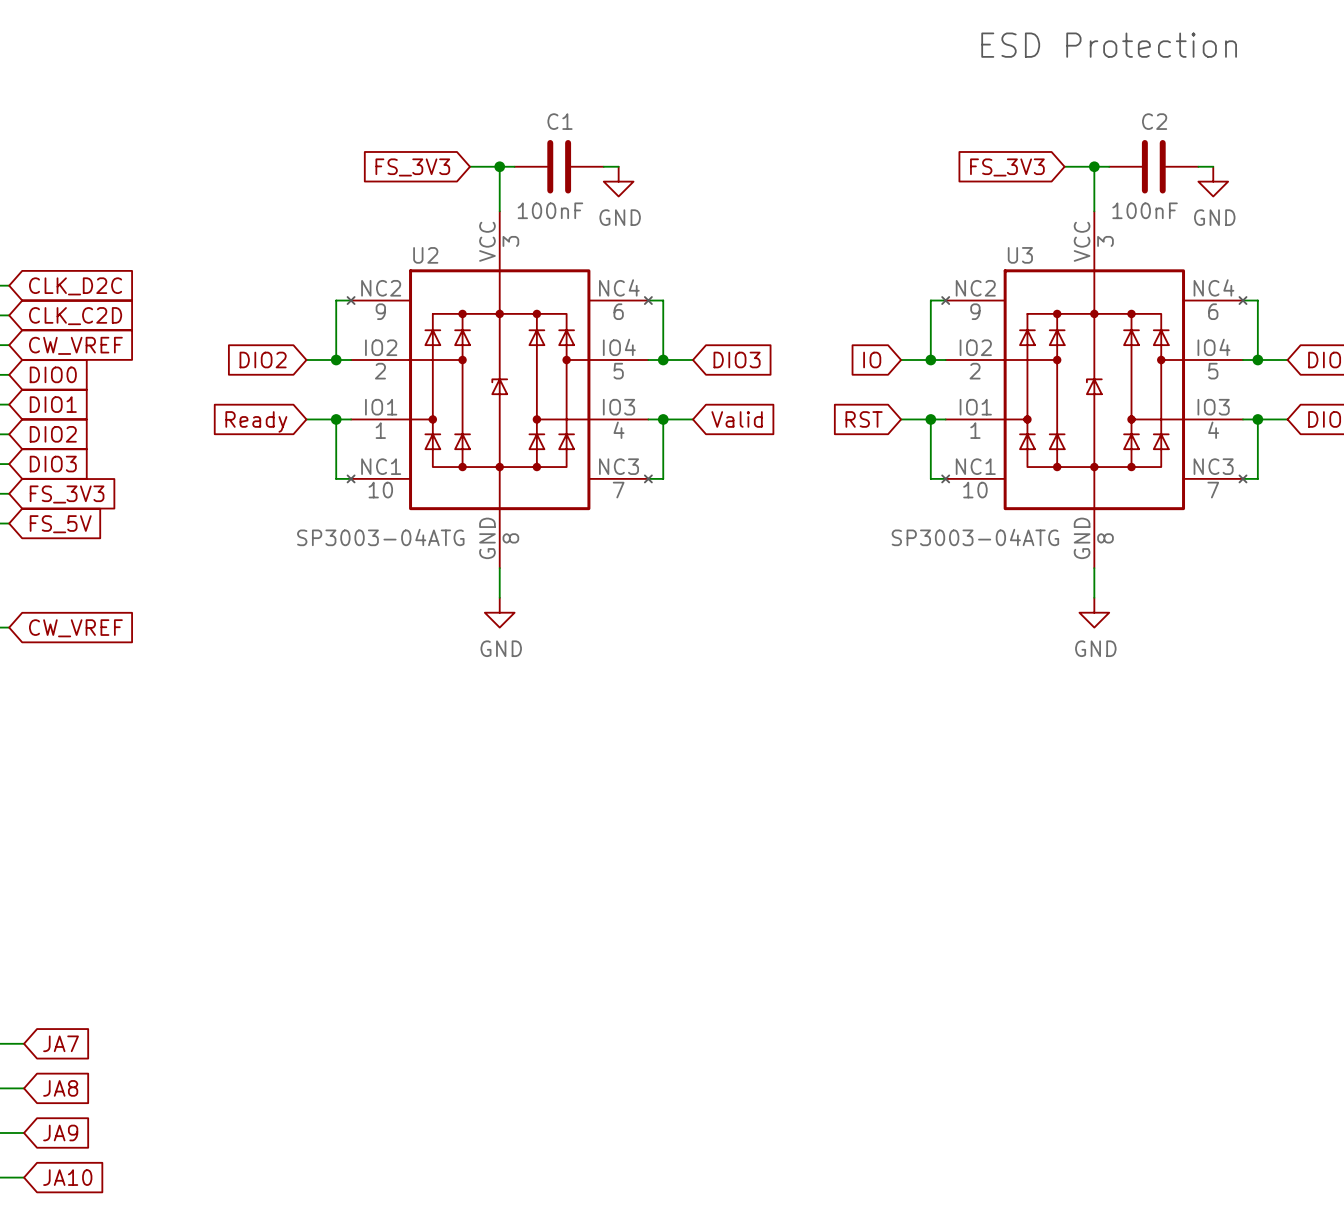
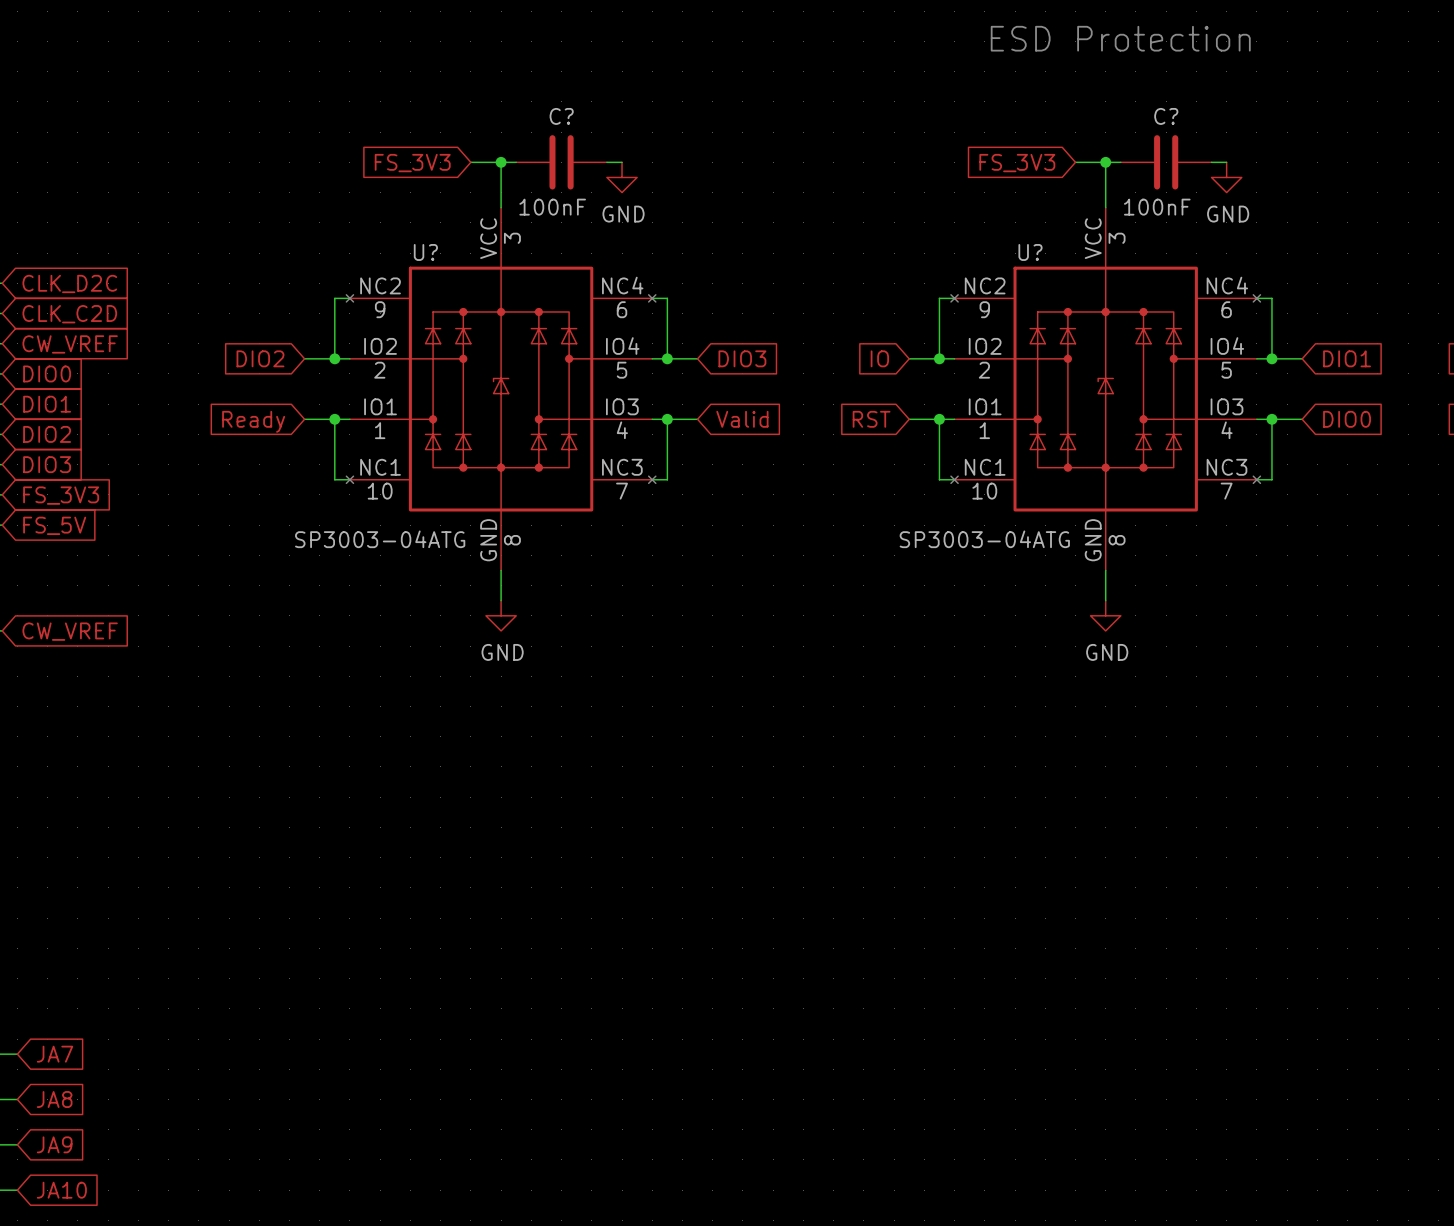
C1 name: C1 (560, 121) -> C? (561, 116)
C2 name: C2 (1154, 121) -> C? (1166, 116)
U2 name: U2 (425, 255) -> U? (425, 252)
U3 name: U3 (1020, 255) -> U? (1030, 252)

